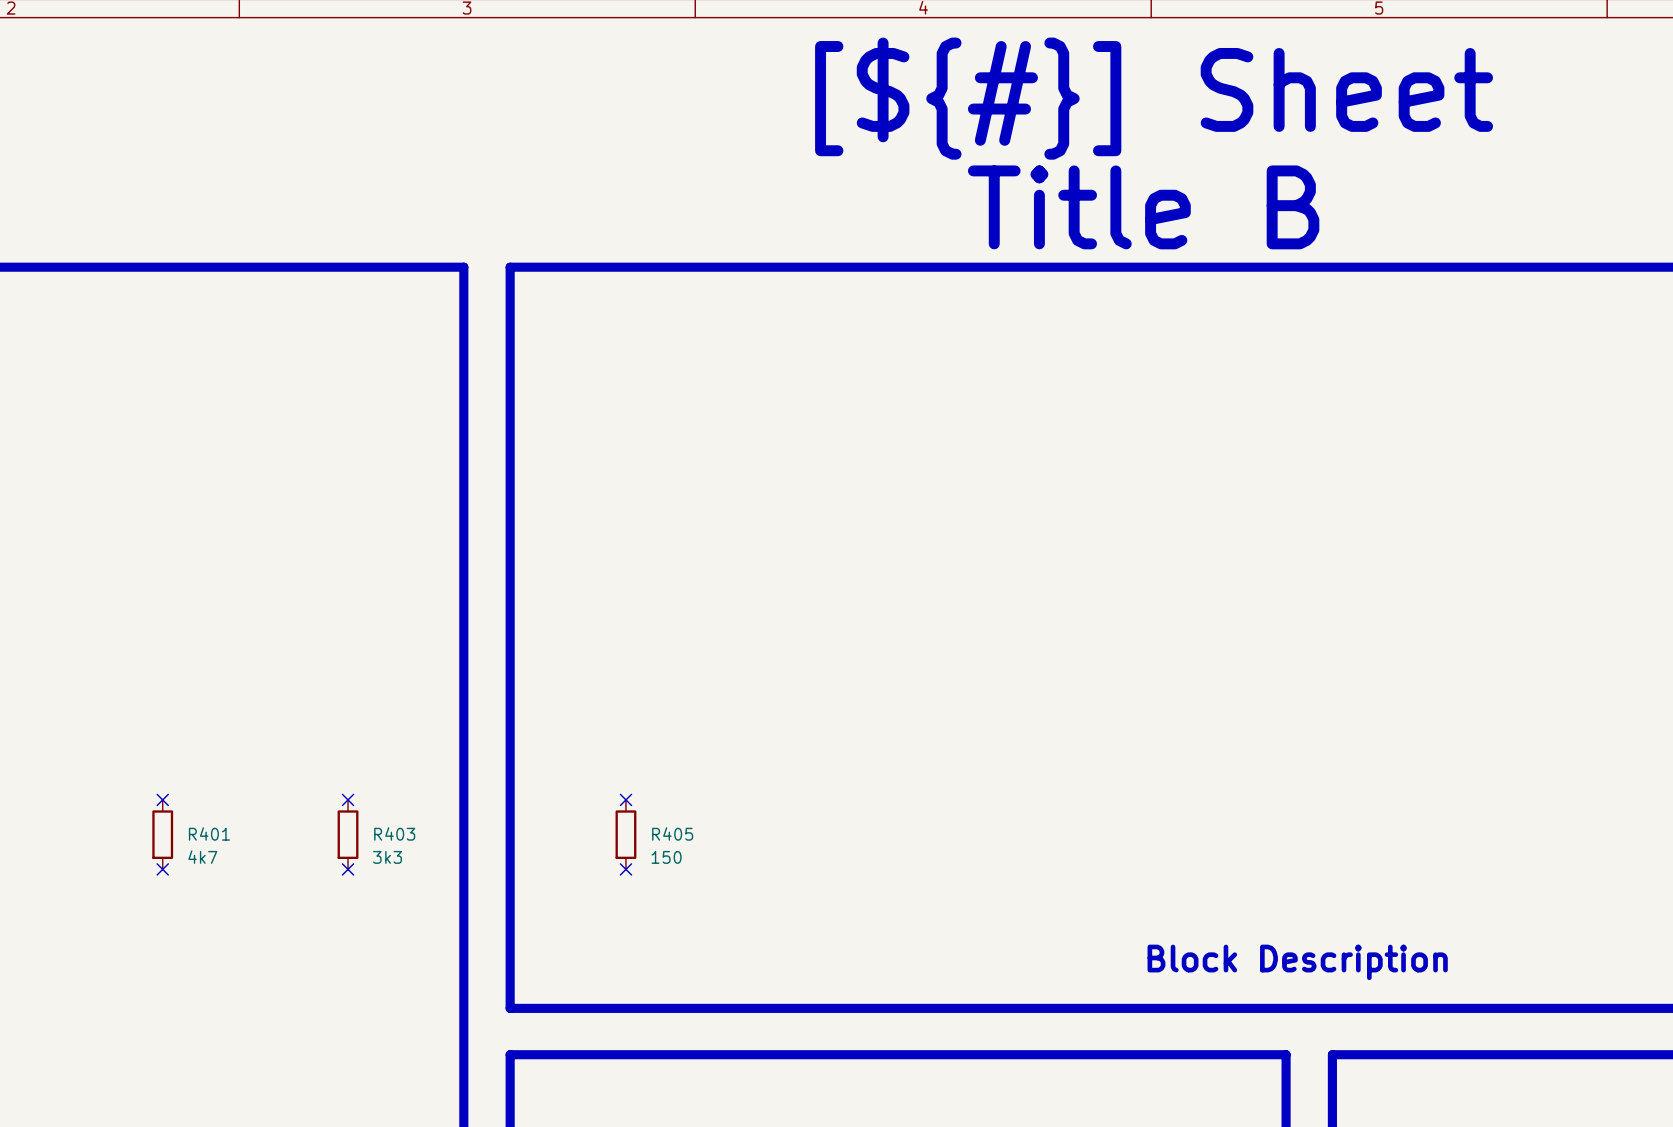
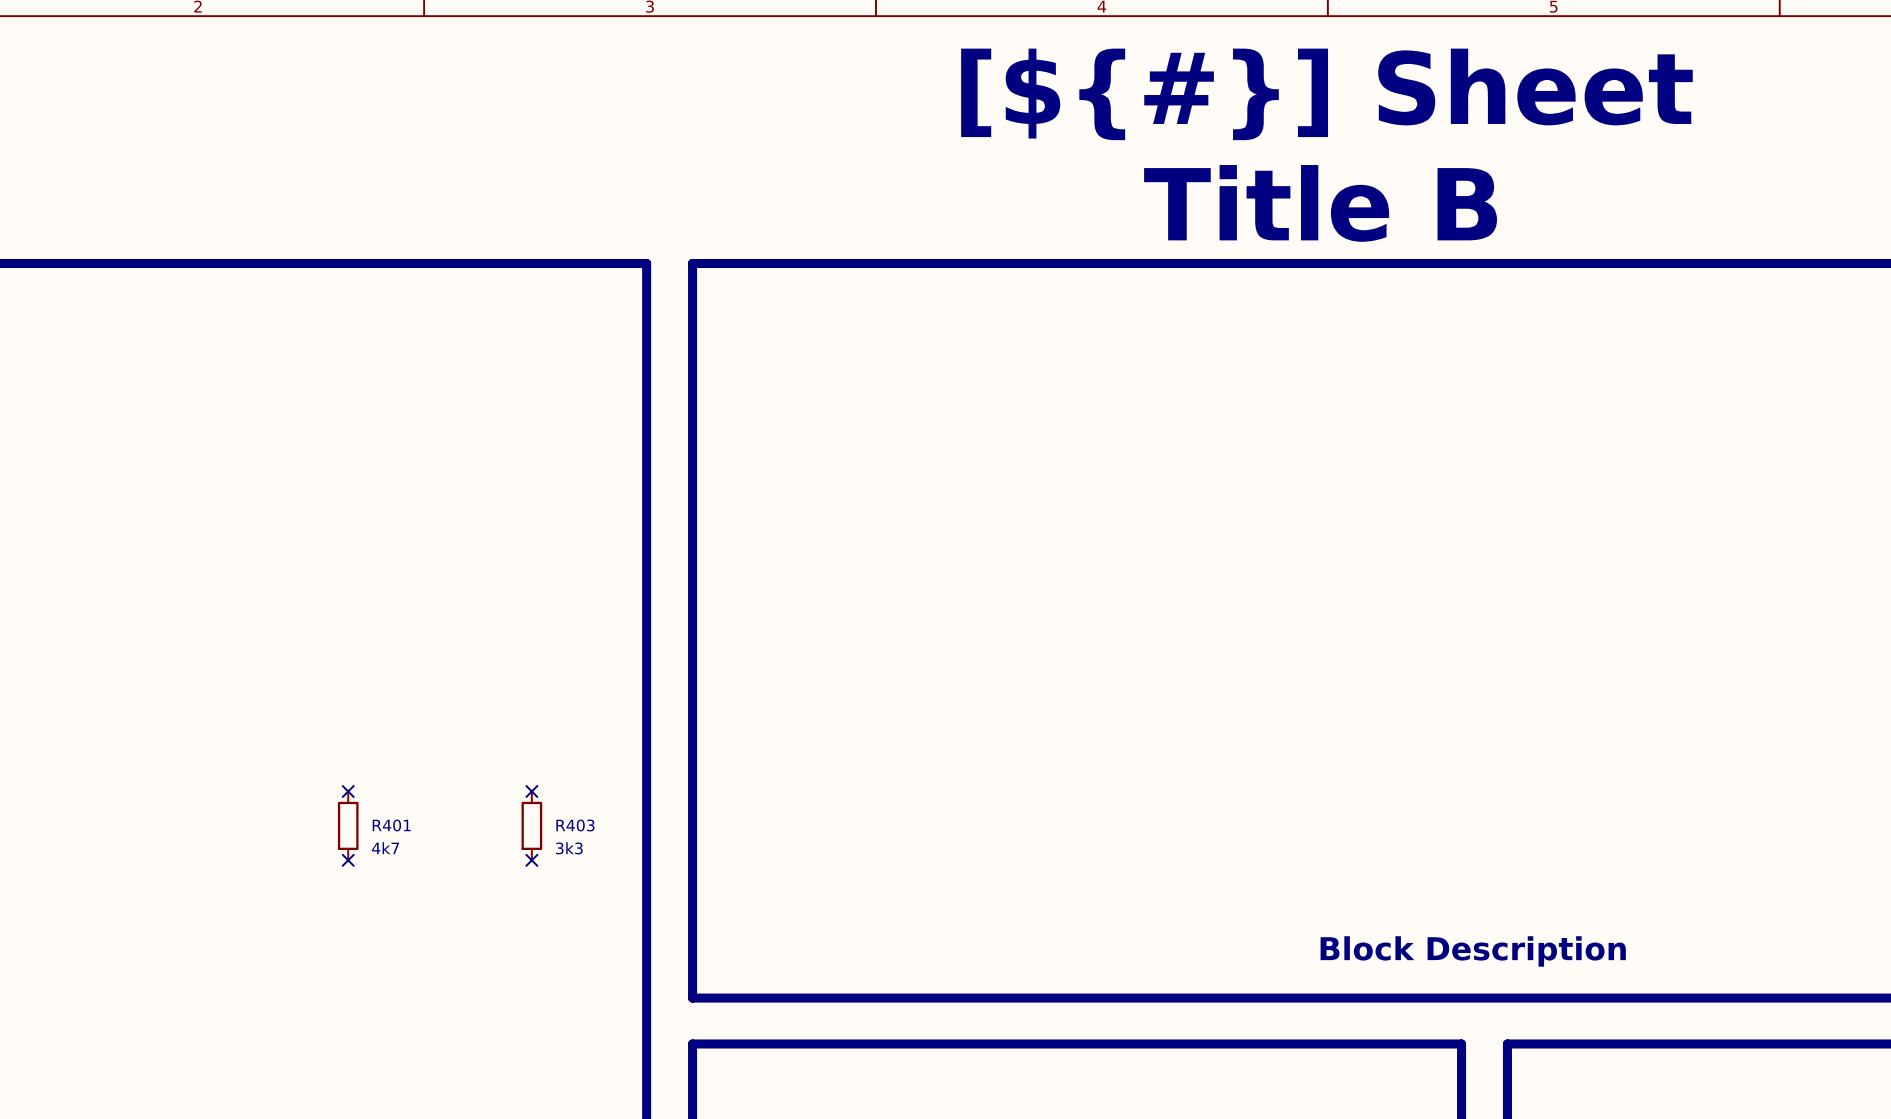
no-connect mark: (625, 799) -> none
R405: 150 (625, 834) -> none
no-connect mark: (625, 869) -> none

